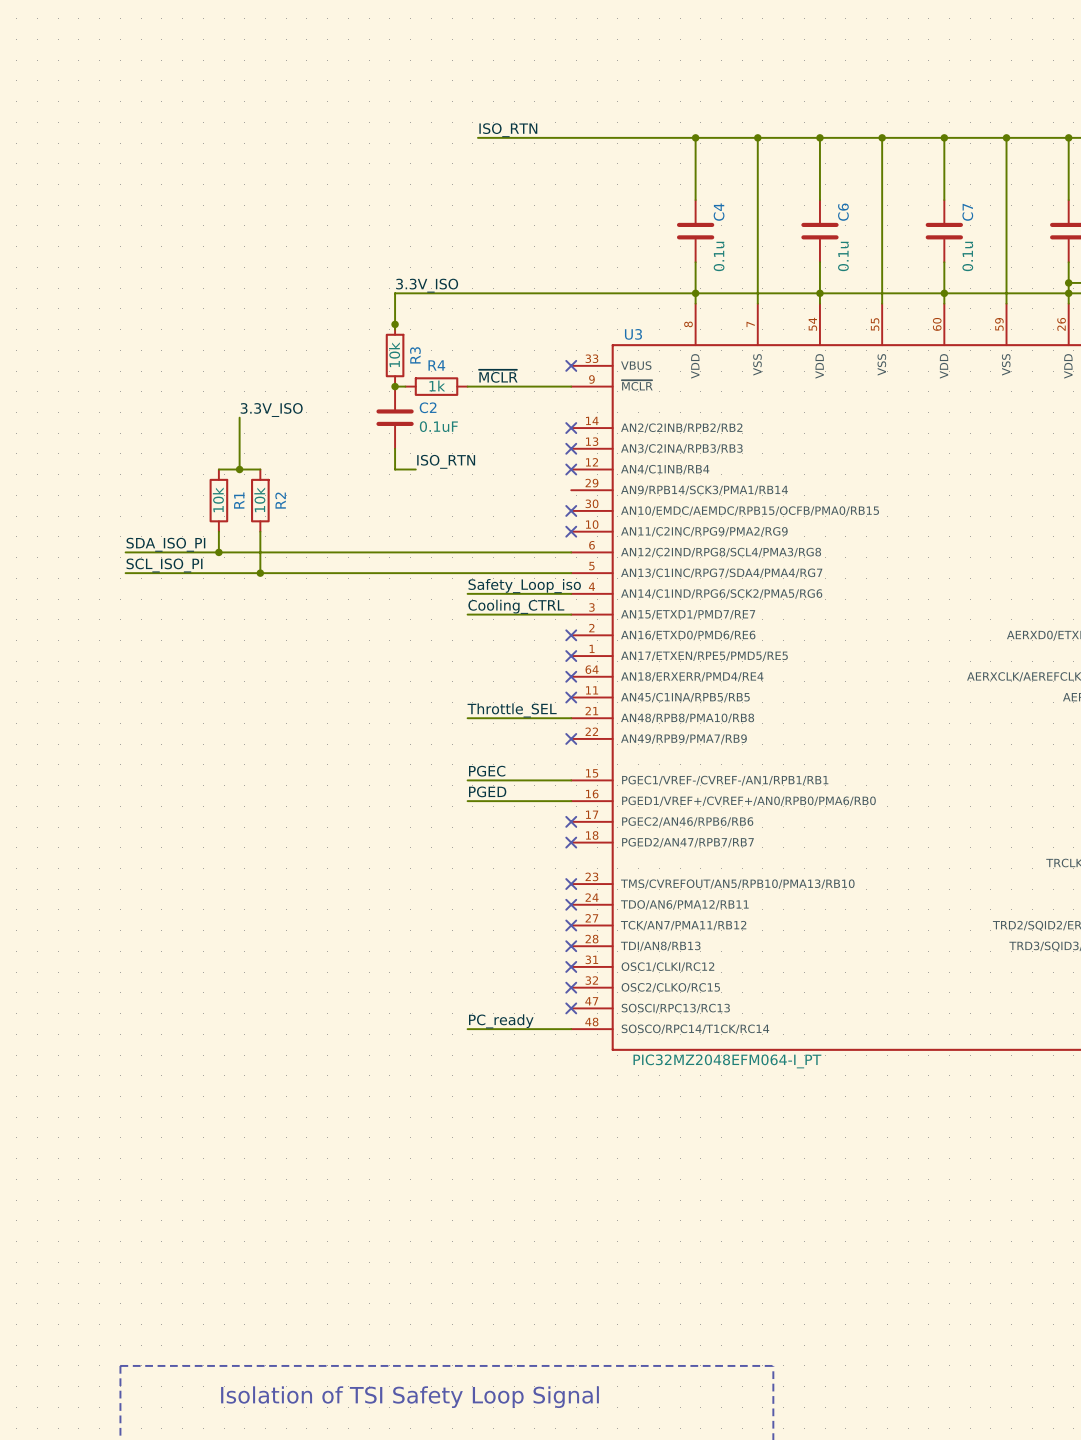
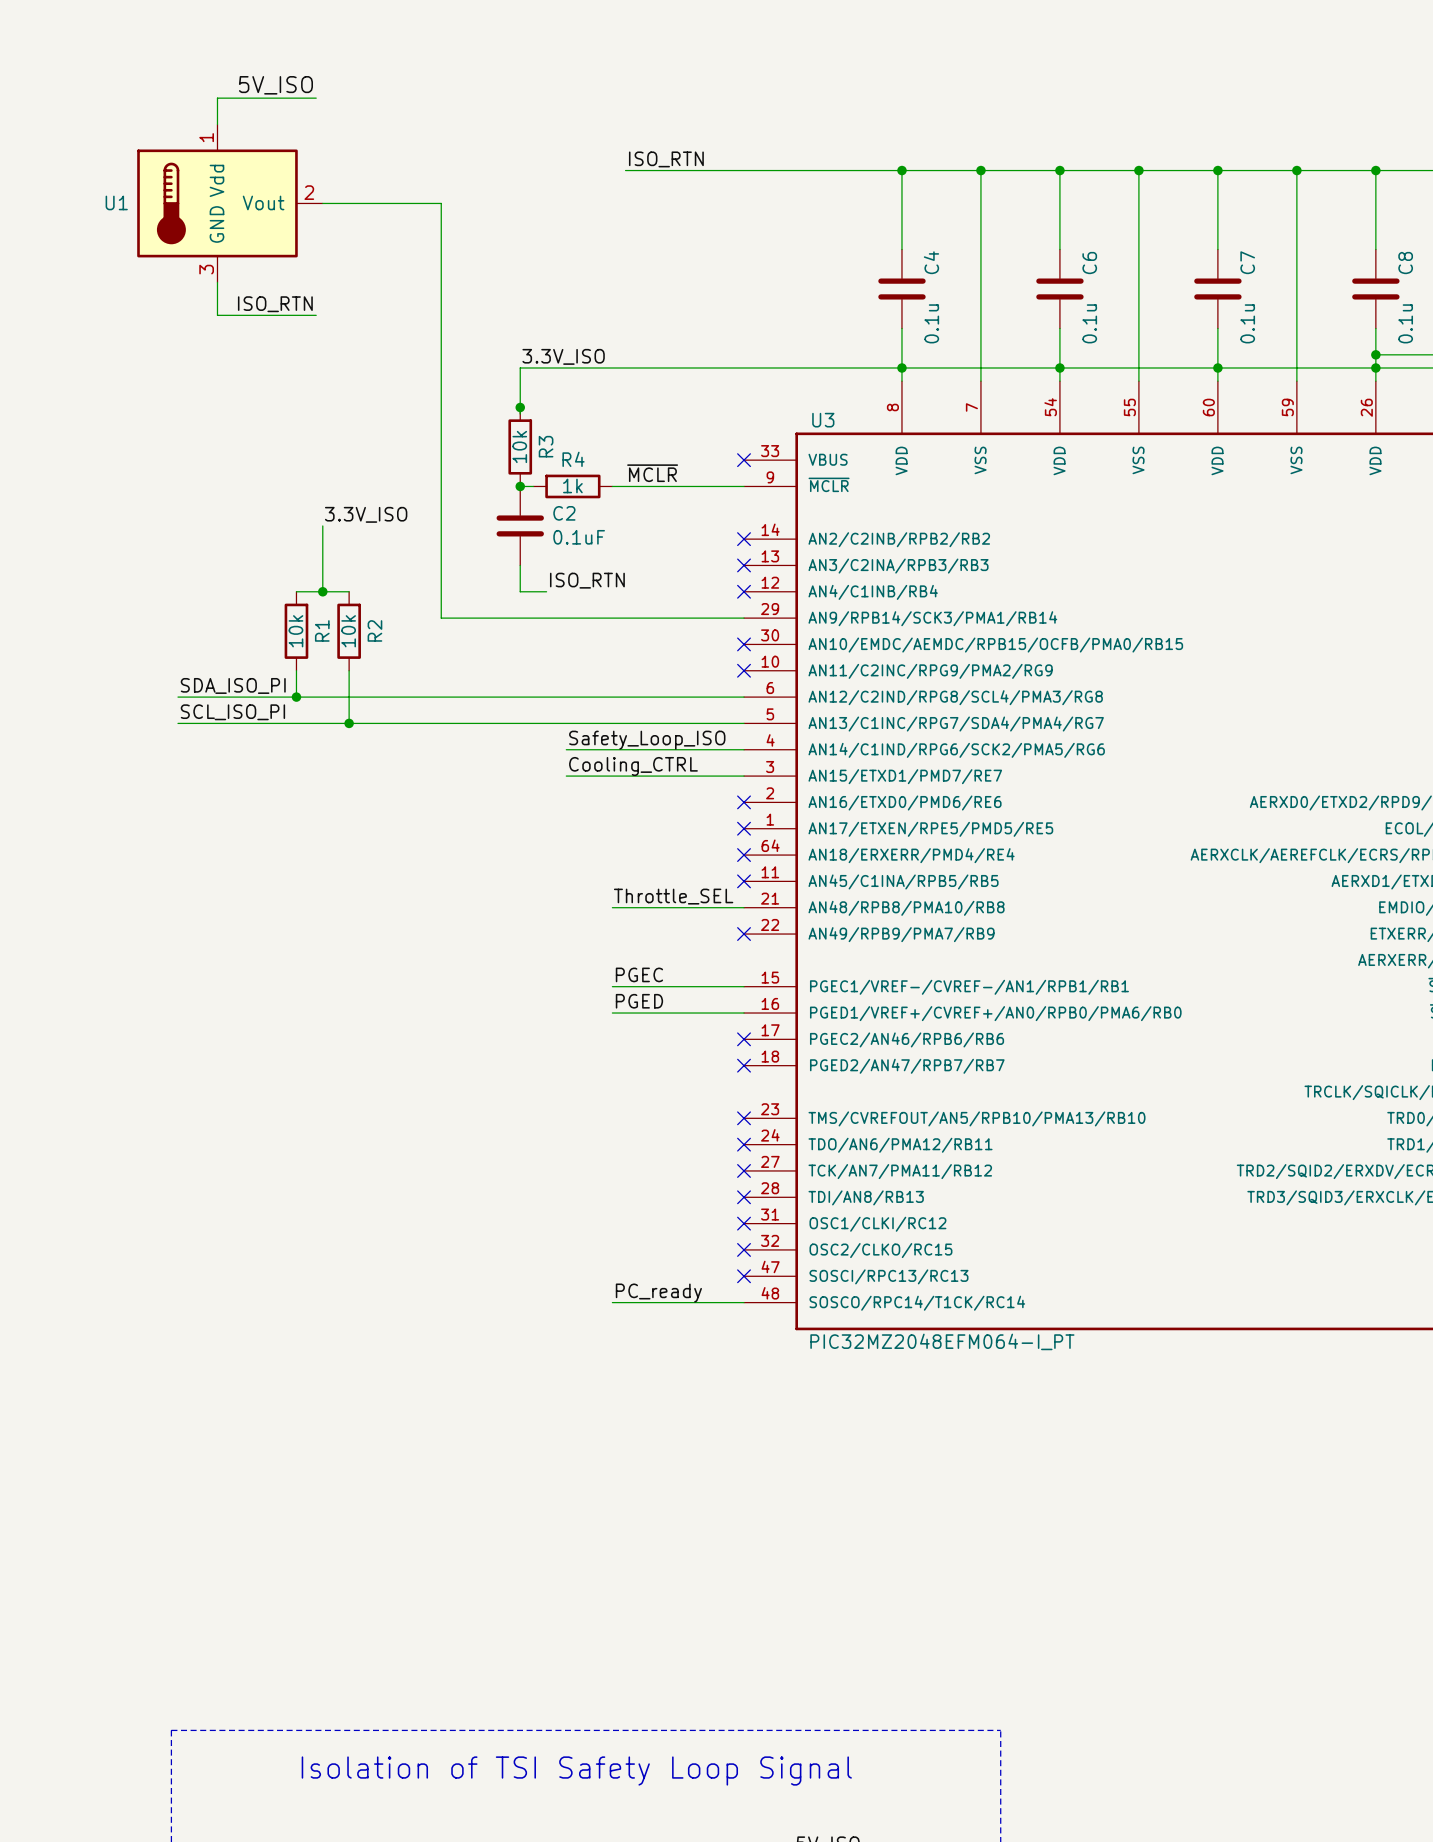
label: none -> 5V_ISO (275, 85)
wire: none -> (316, 98) (217, 98) (217, 124)
U1: none -> (229, 203)
wire: none -> (322, 203) (441, 203) (441, 618) (744, 618)
wire: none -> (217, 282) (217, 315) (316, 315)
label: none -> ISO_RTN (275, 304)
label: Safety_Loop_iso (524, 586) -> Safety_Loop_ISO (647, 740)
wire: none -> (566, 749) (612, 749)
label position: Cooling_CTRL (516, 606) -> Cooling_CTRL (633, 766)
wire: none -> (566, 776) (612, 776)

